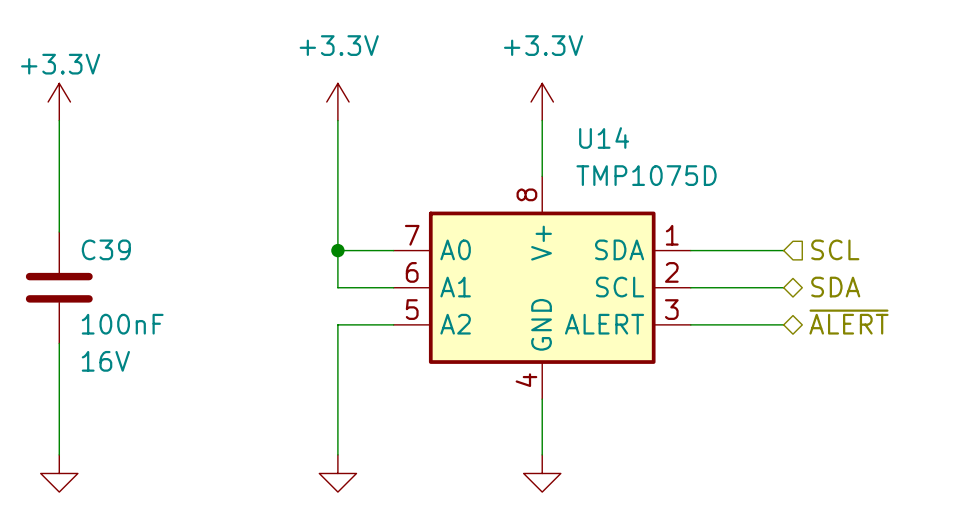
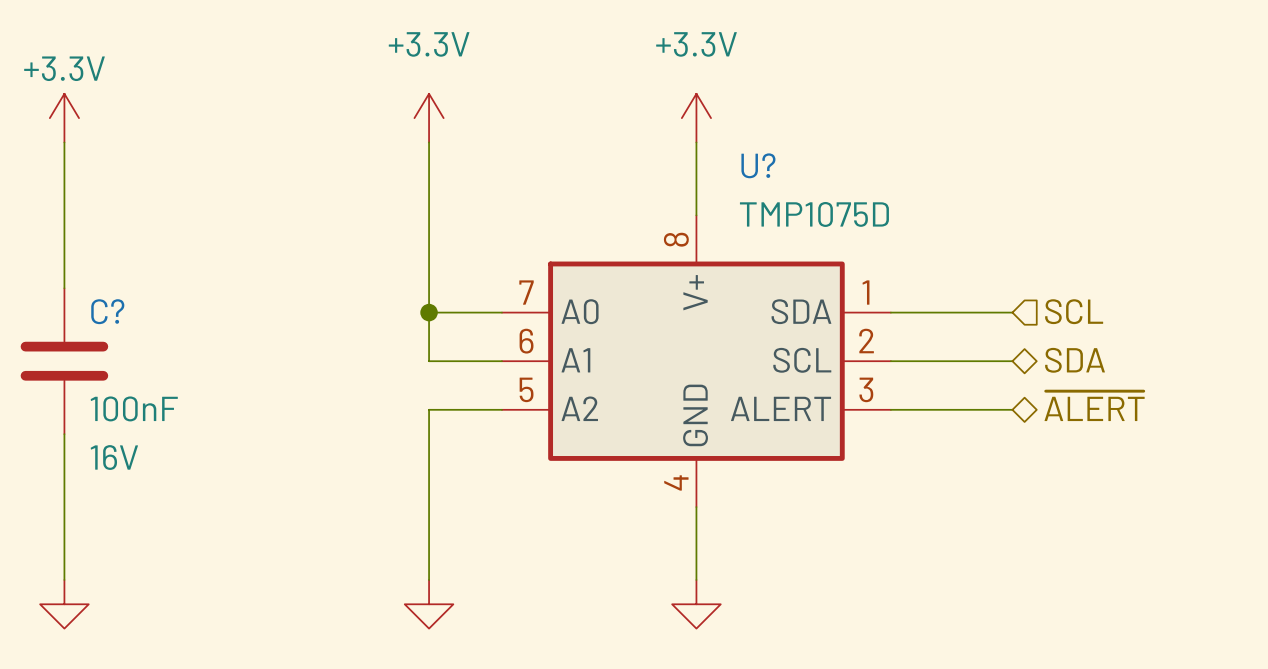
U14 name: U14 (604, 138) -> U? (758, 165)
C39 name: C39 (106, 249) -> C? (107, 311)

